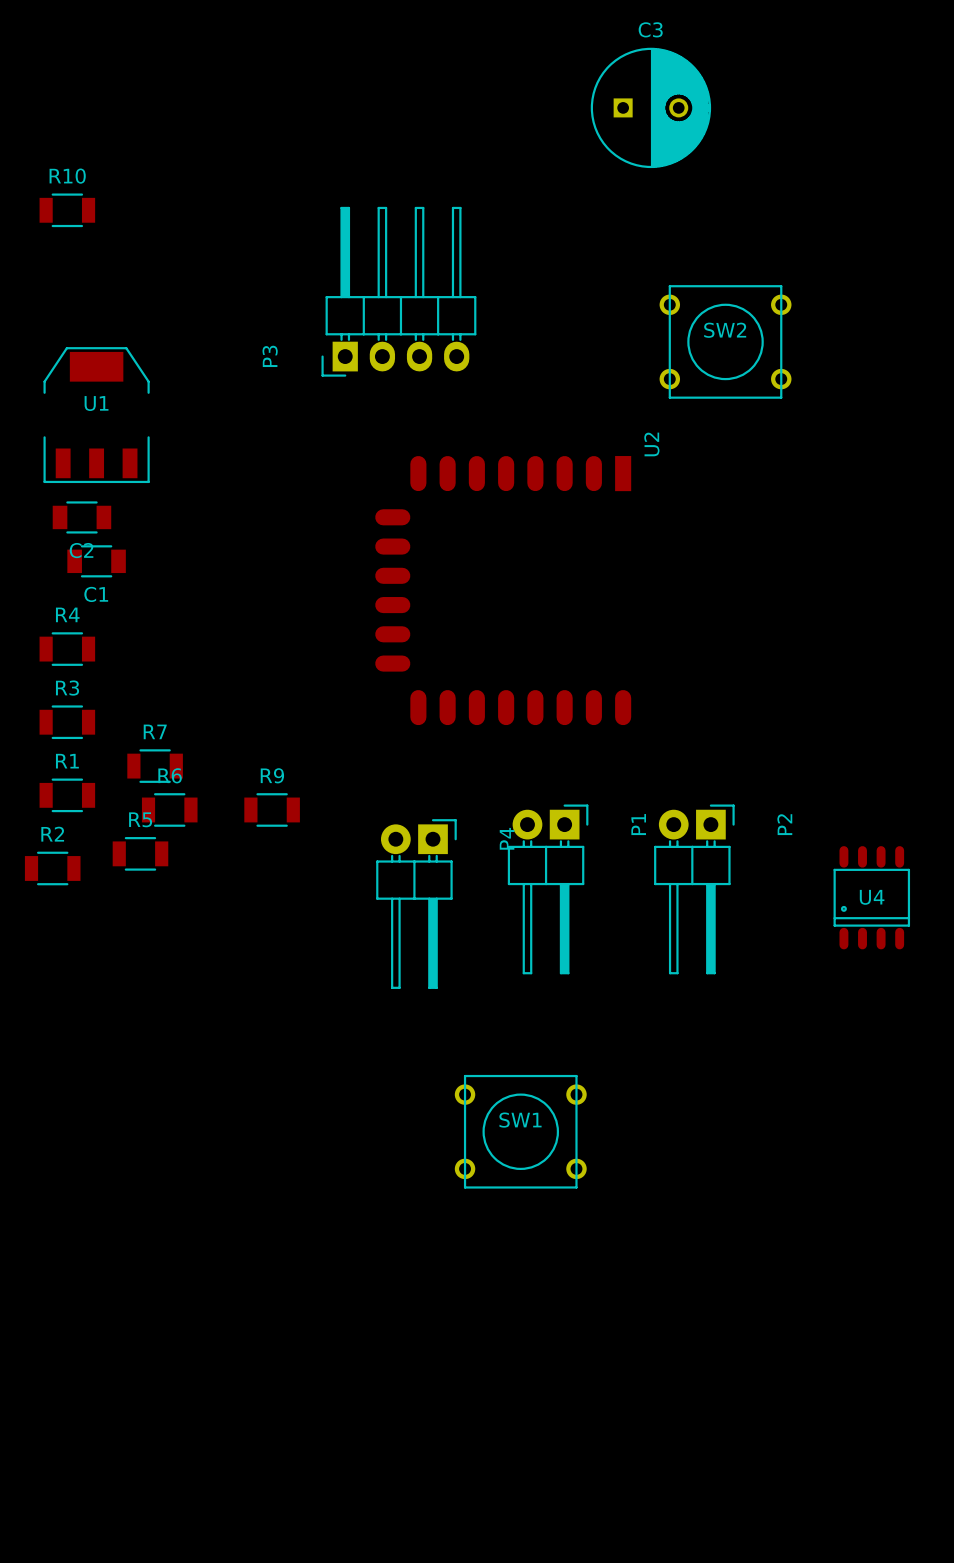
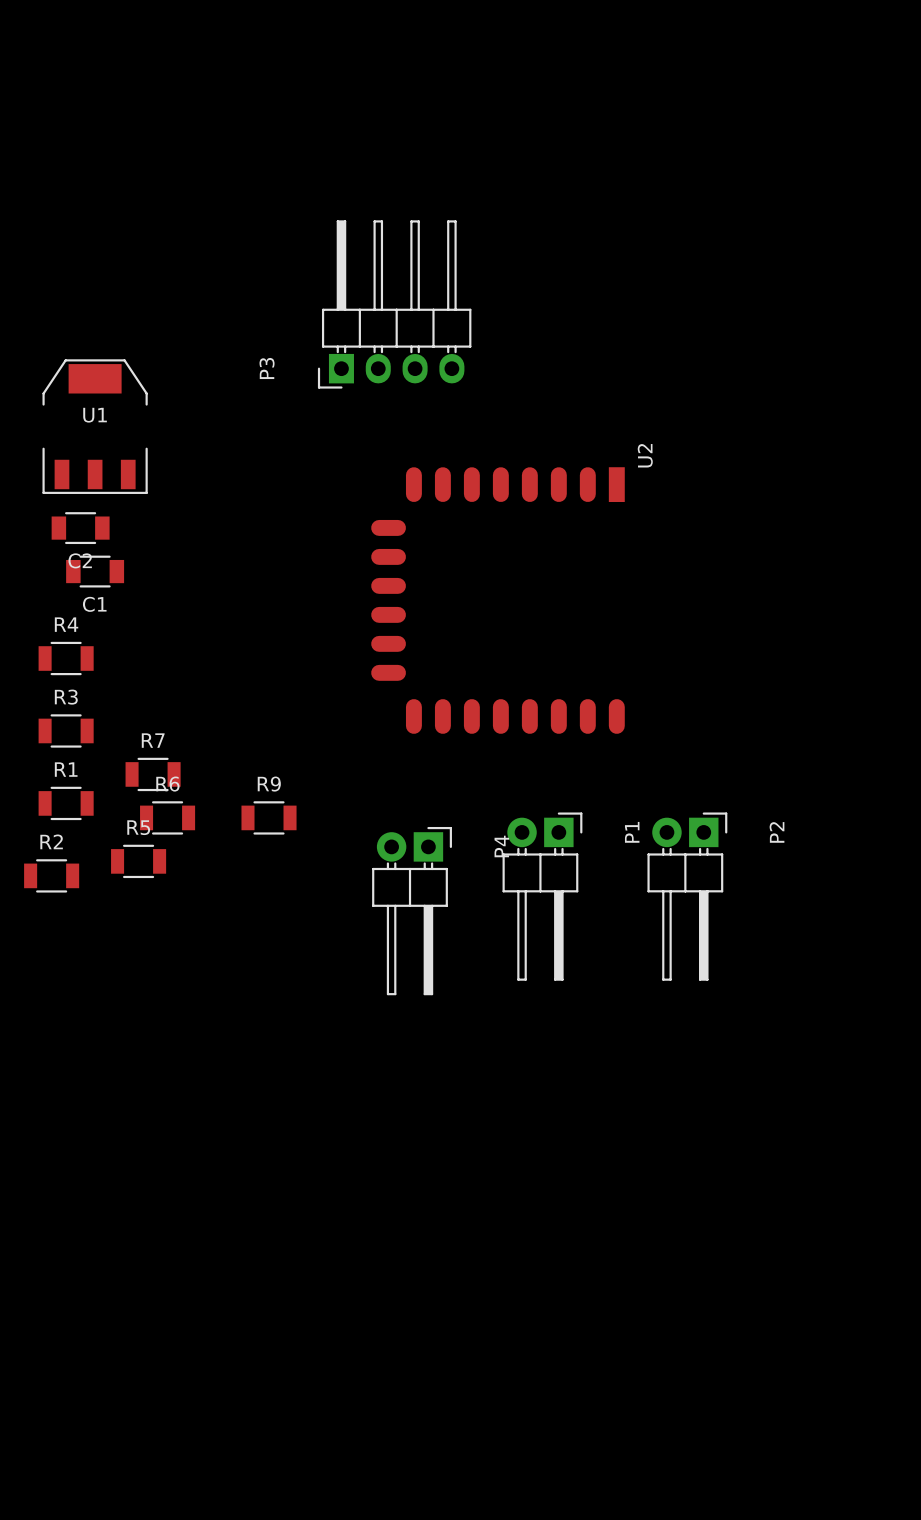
C3: (650, 107) -> none
R10: (67, 210) -> none
SW2: (725, 341) -> none
U4: (871, 897) -> none
SW1: (520, 1131) -> none

